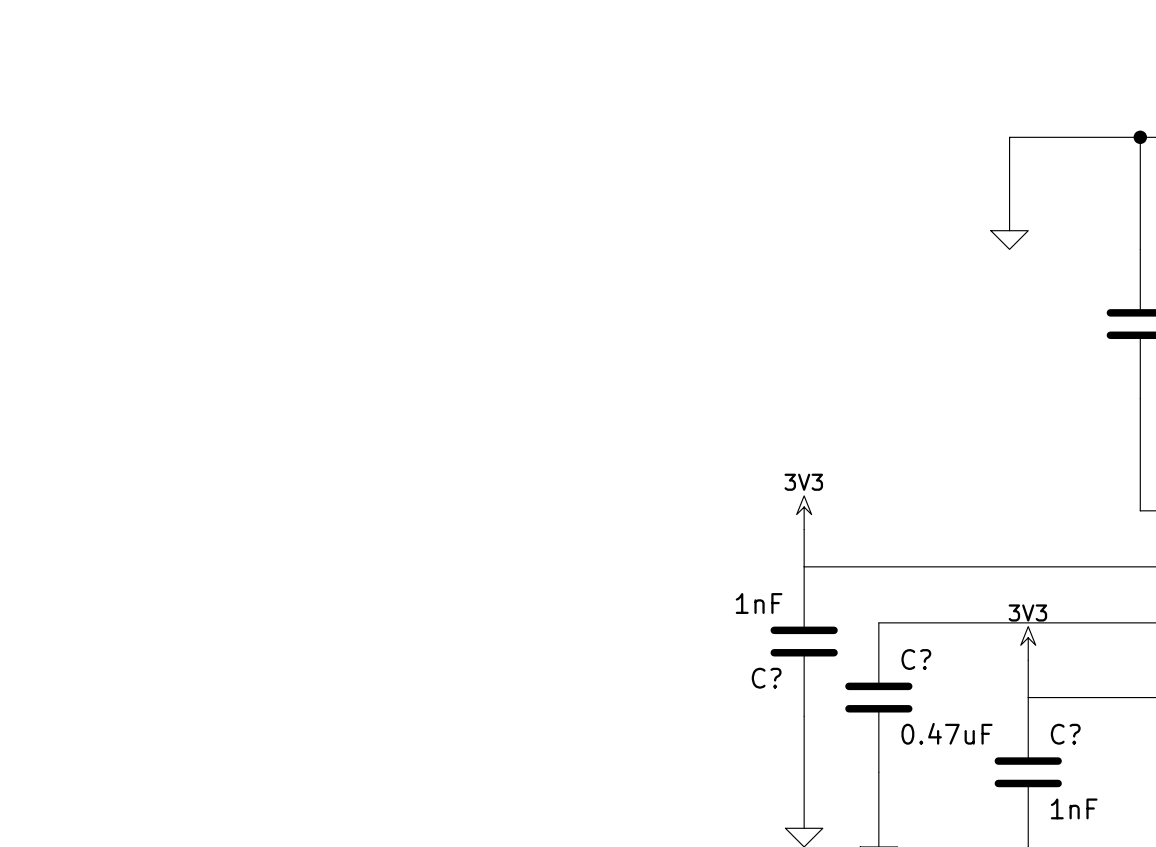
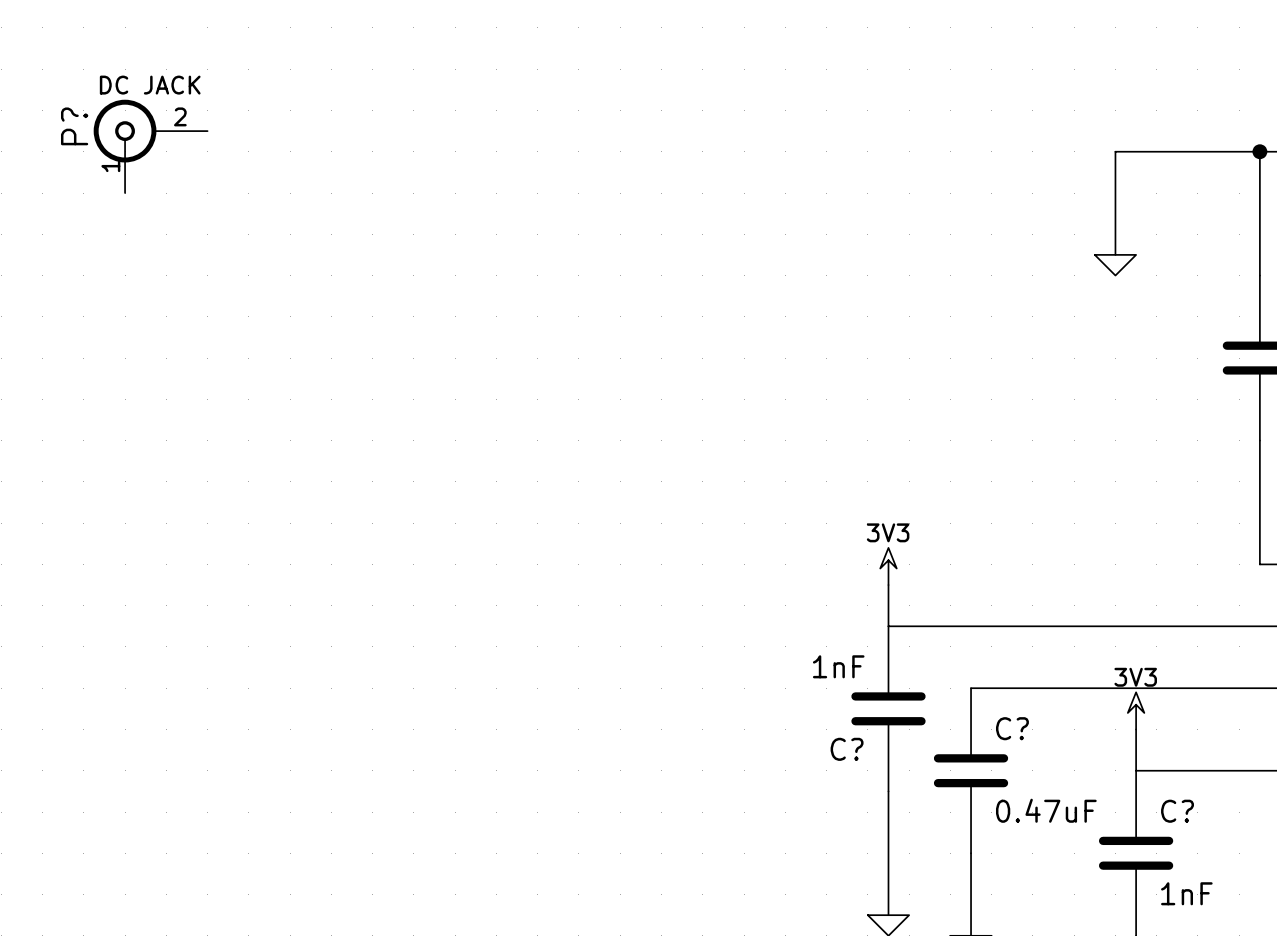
P?: none -> DC JACK (150, 146)

